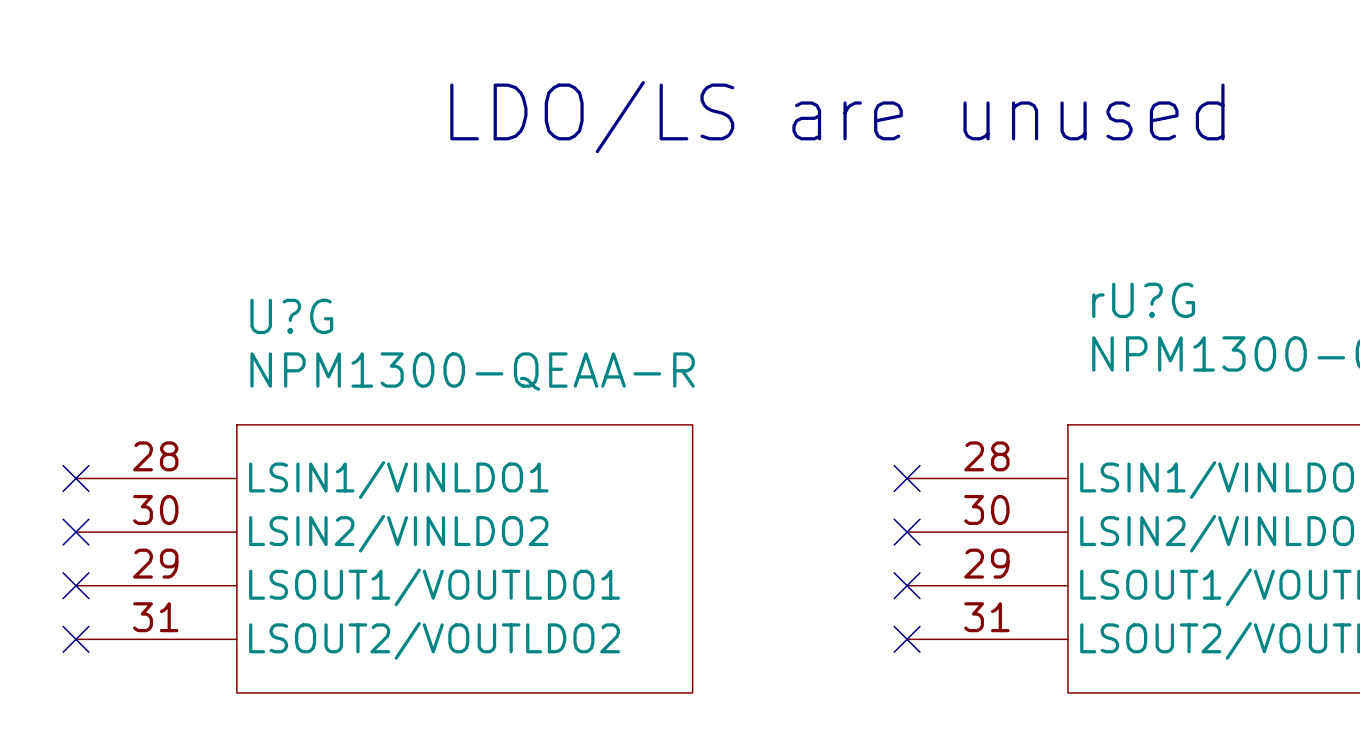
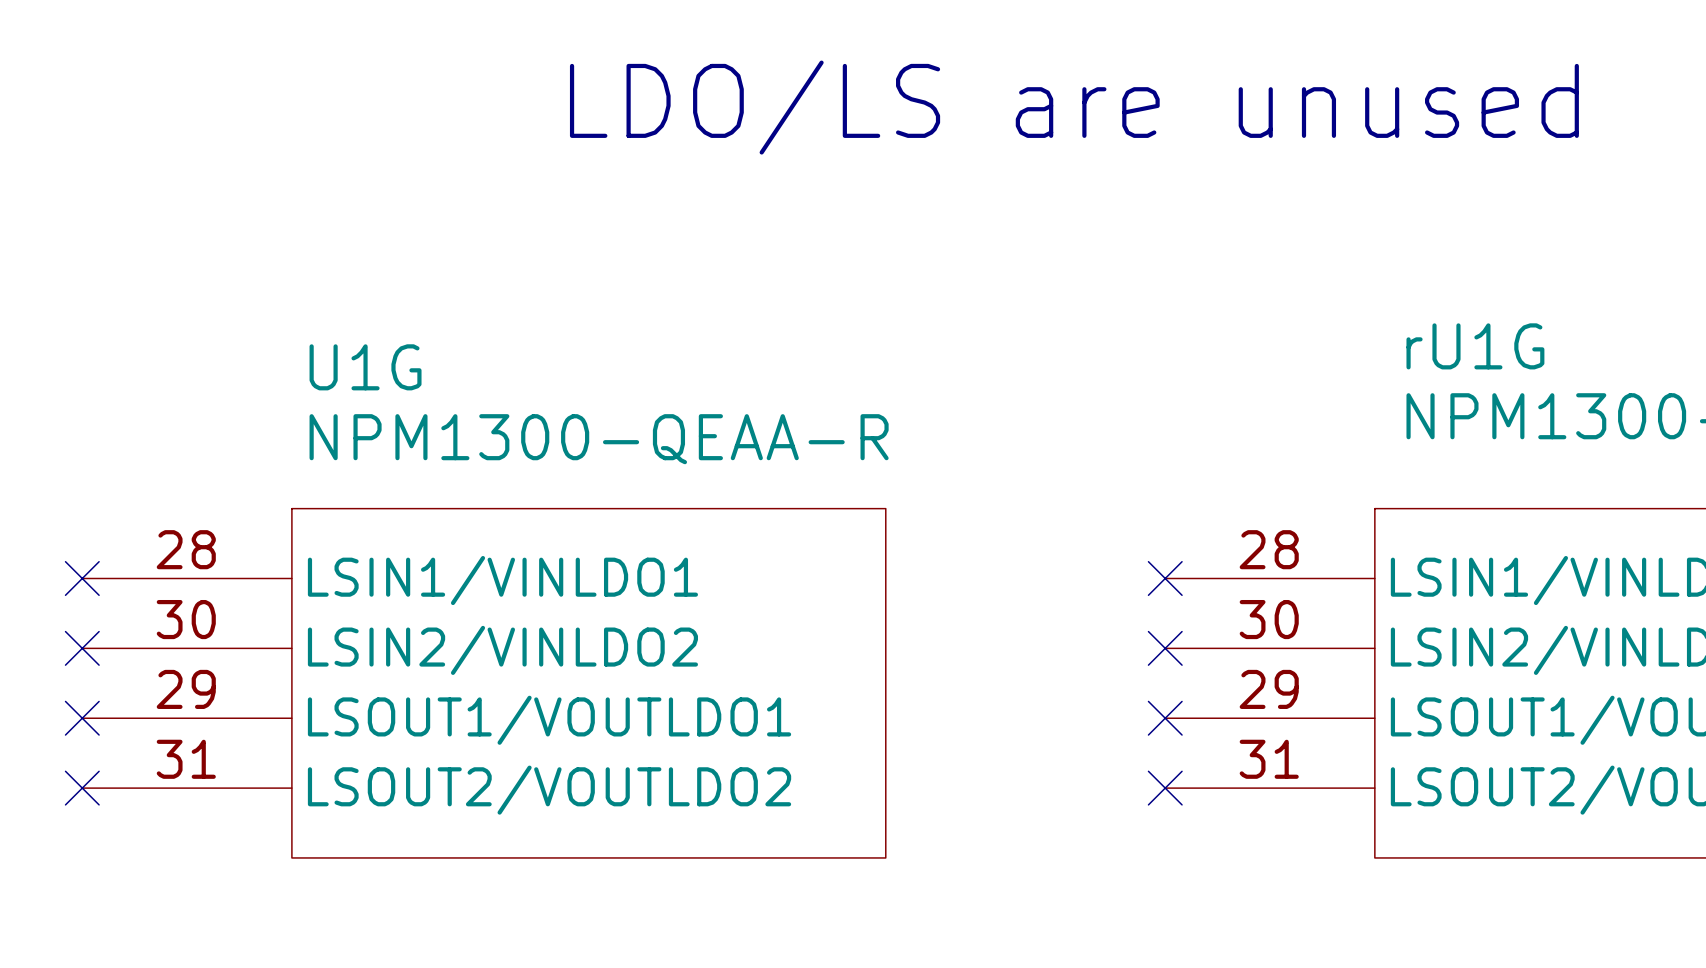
rU?G name: rU?G (1143, 300) -> rU1G (1475, 346)
U?G name: U?G (291, 316) -> U1G (365, 367)

